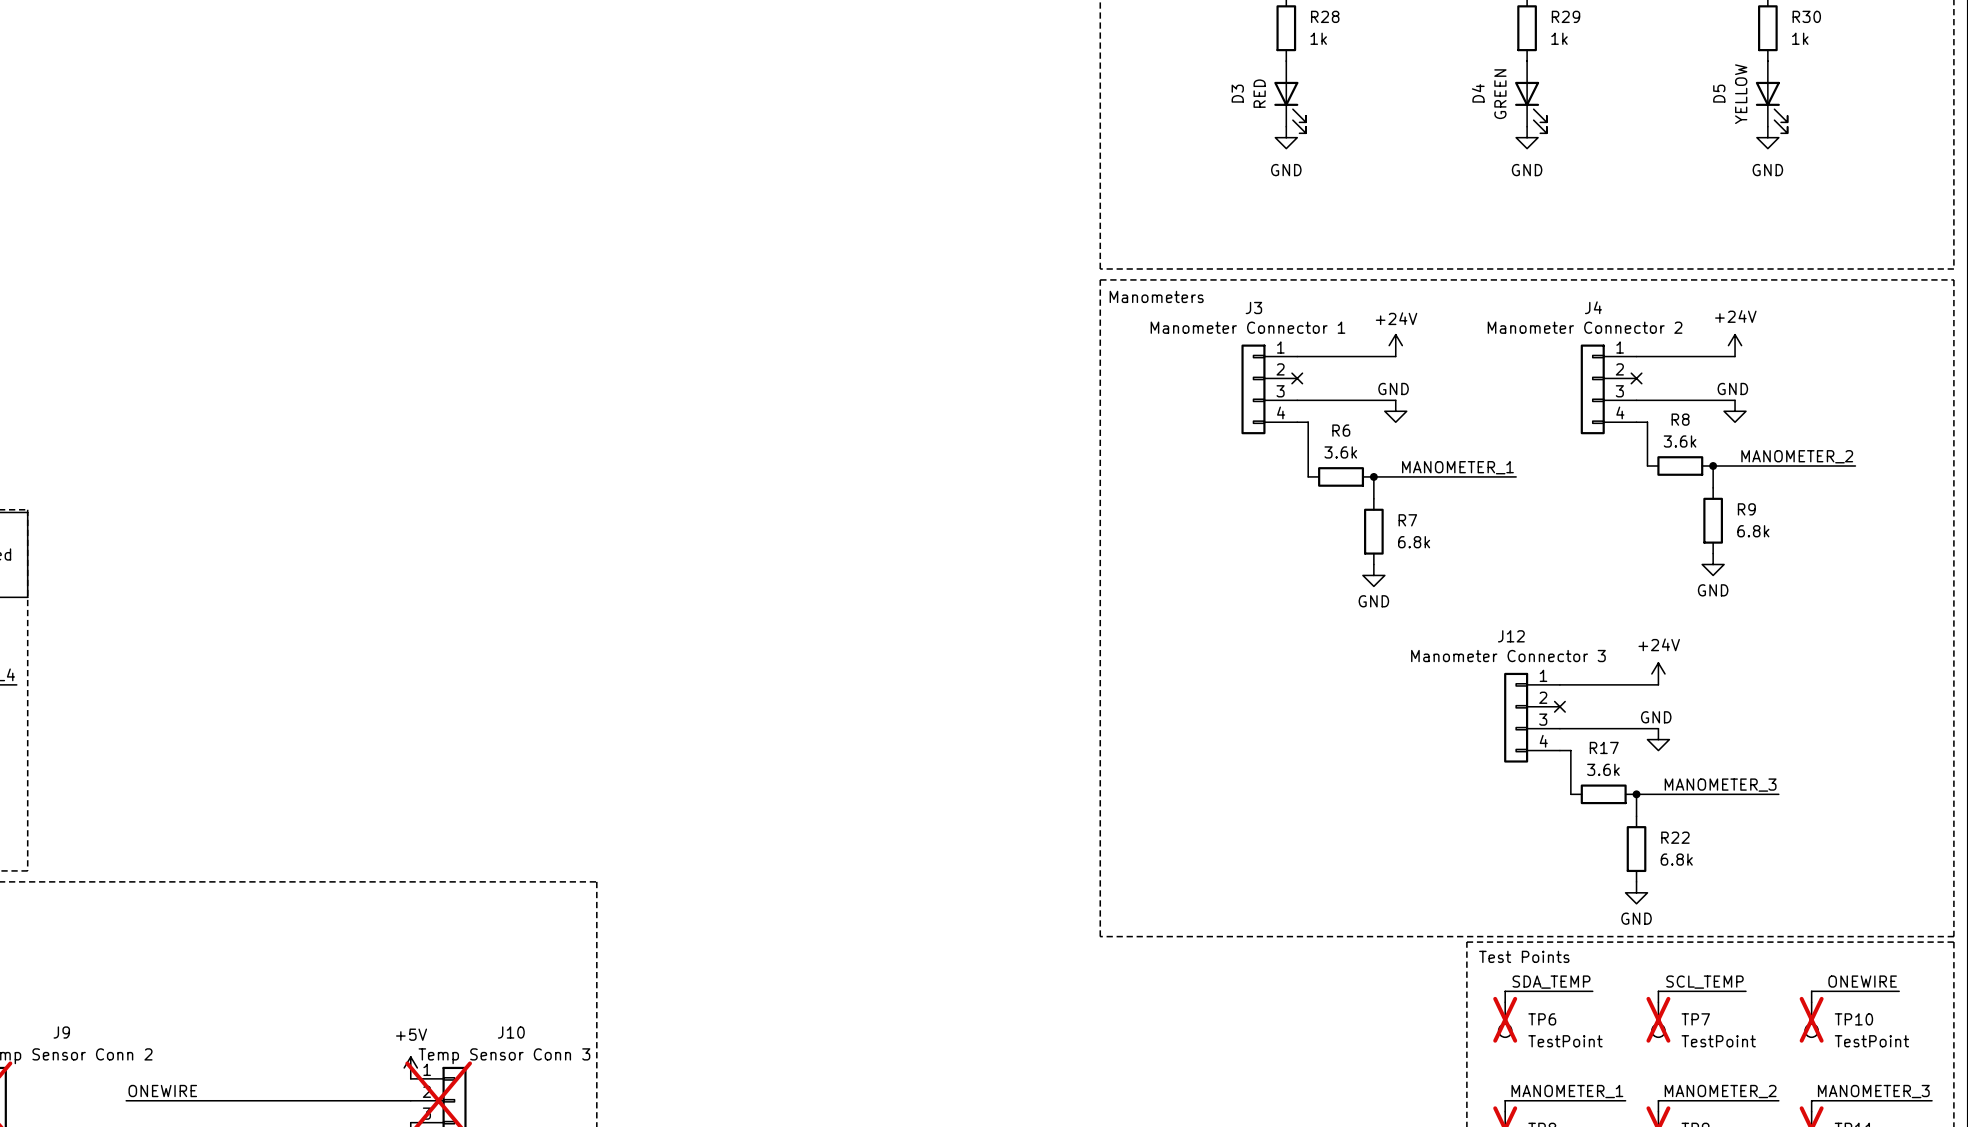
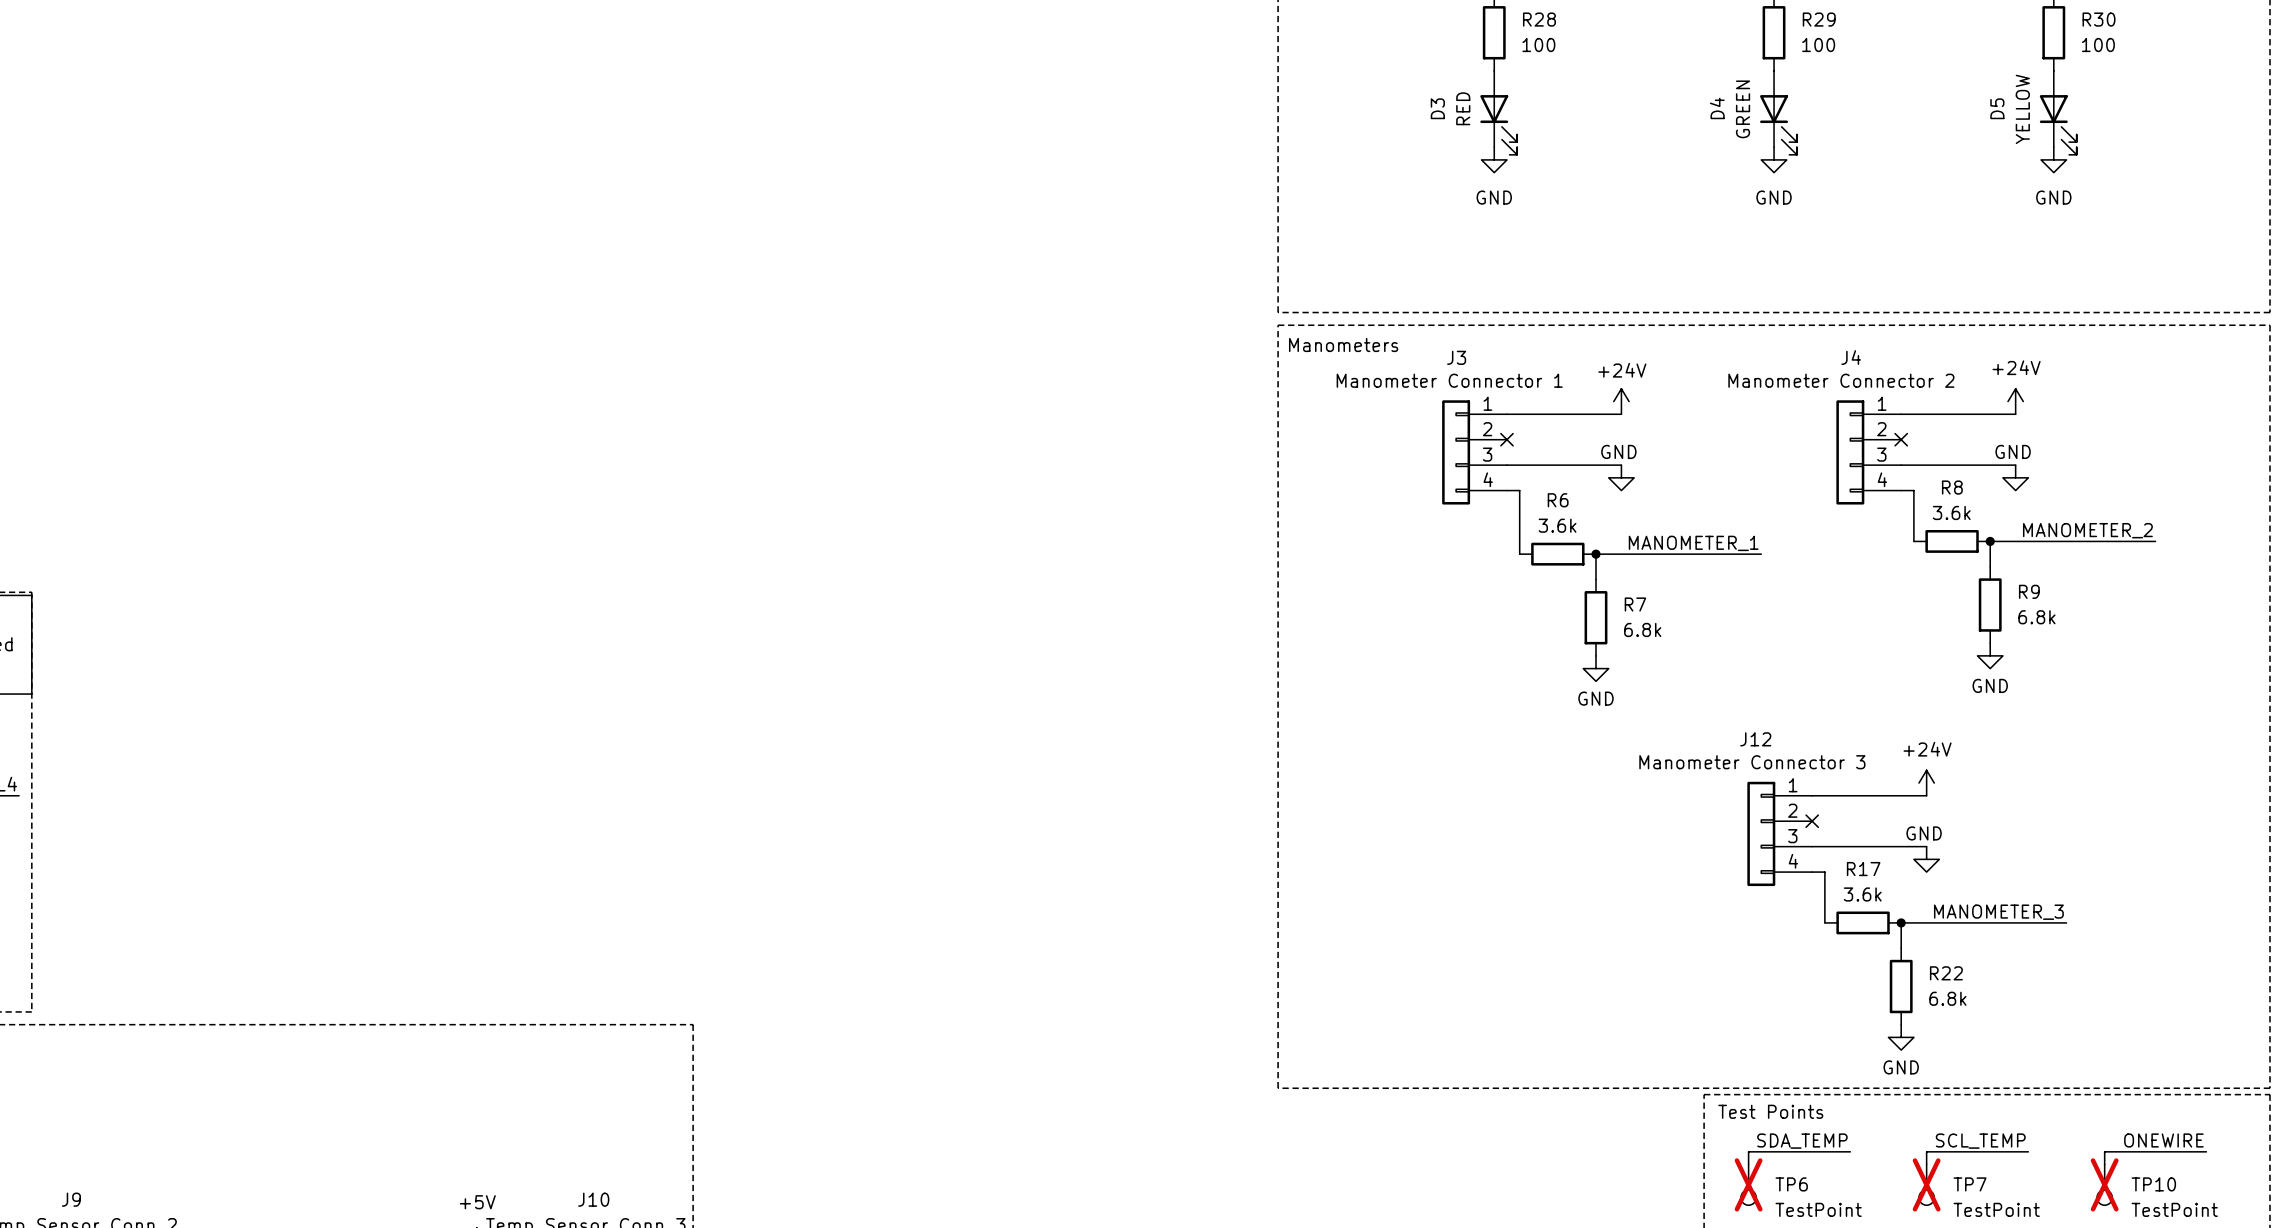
R28 value: 1k (1318, 38) -> 100 (1538, 45)
R29 value: 1k (1559, 38) -> 100 (1818, 45)
R30 value: 1k (1800, 38) -> 100 (2098, 45)

